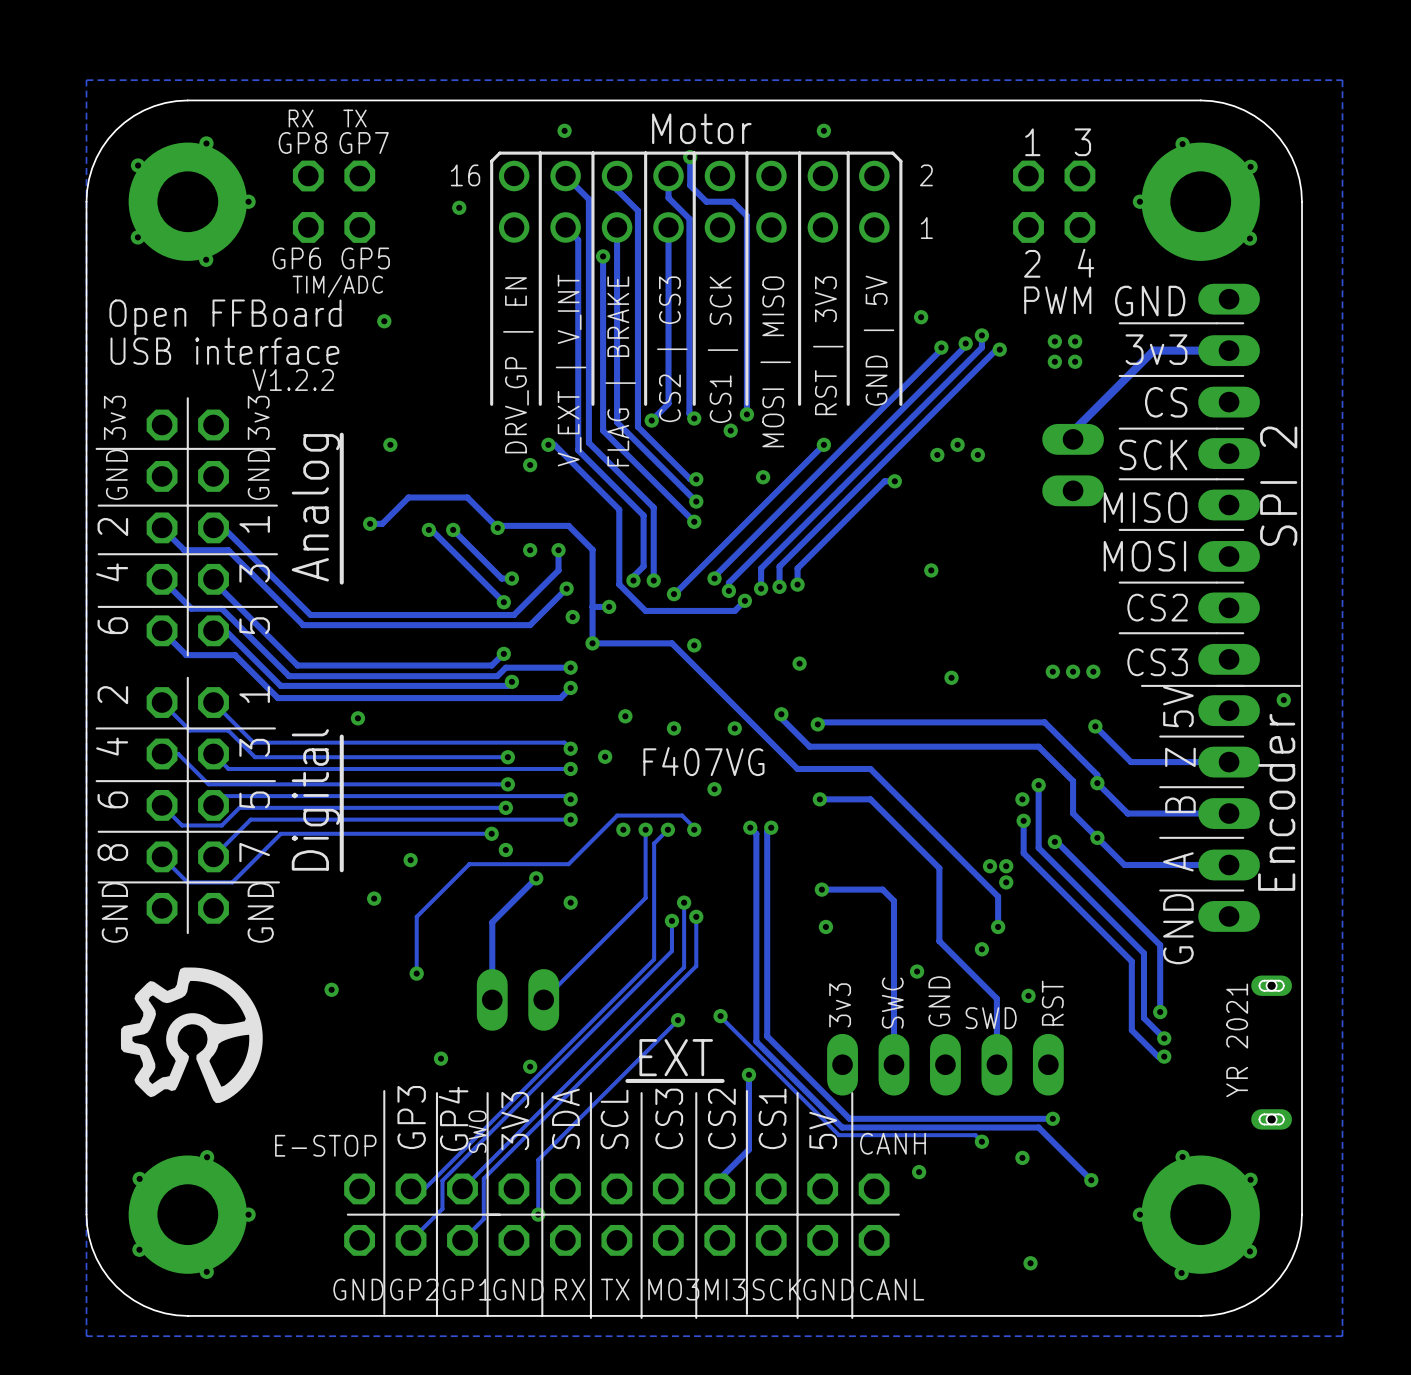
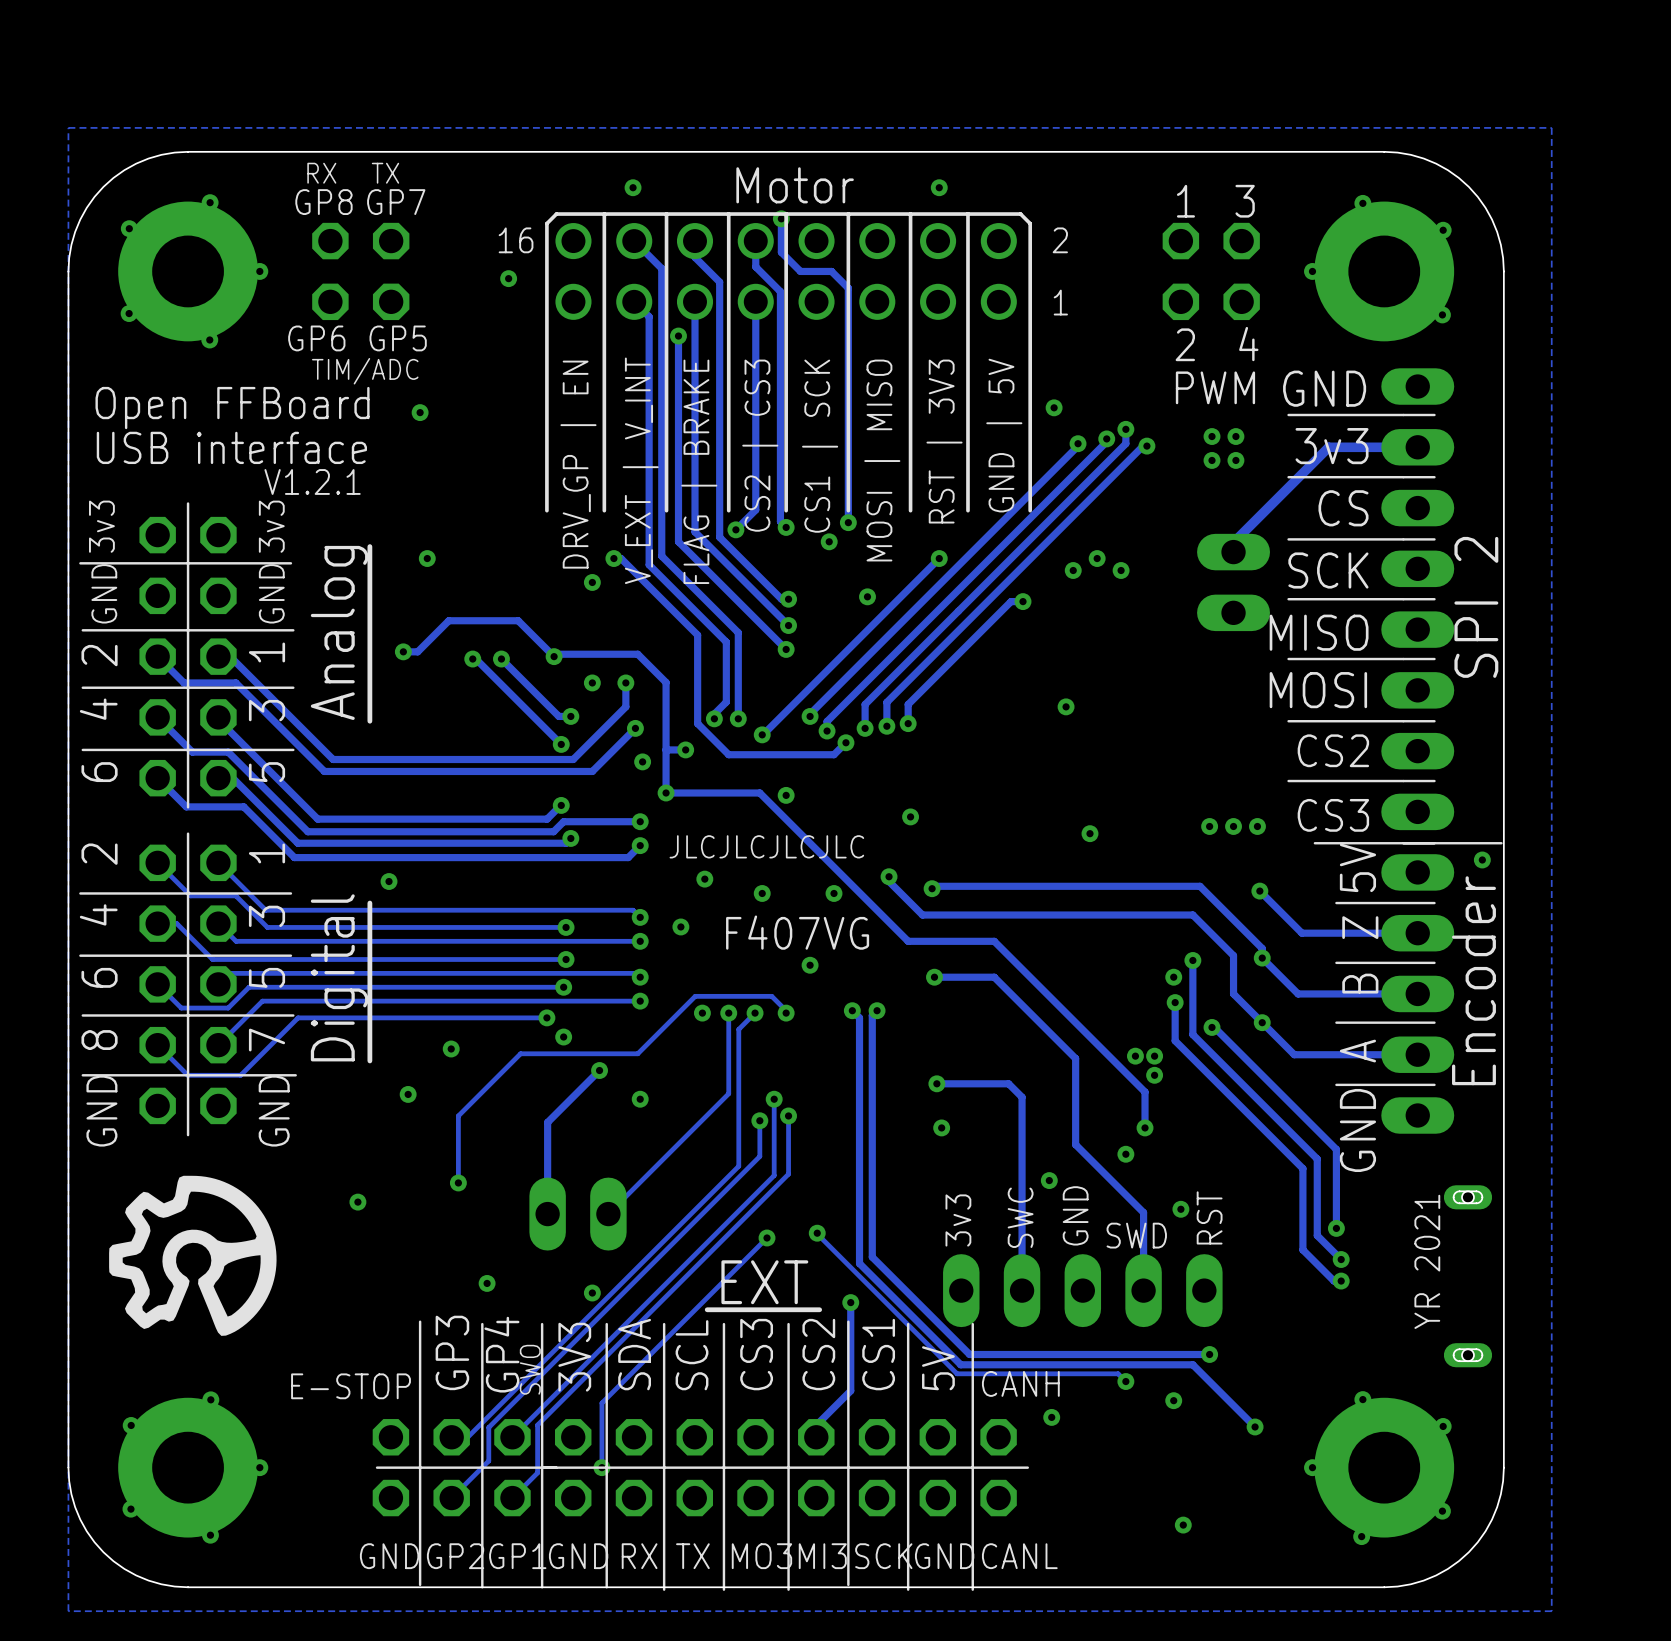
text: V1.2.2 (293, 380) -> V1.2.1 (312, 481)
text: none -> JLCJLCJLCJLC (766, 846)

